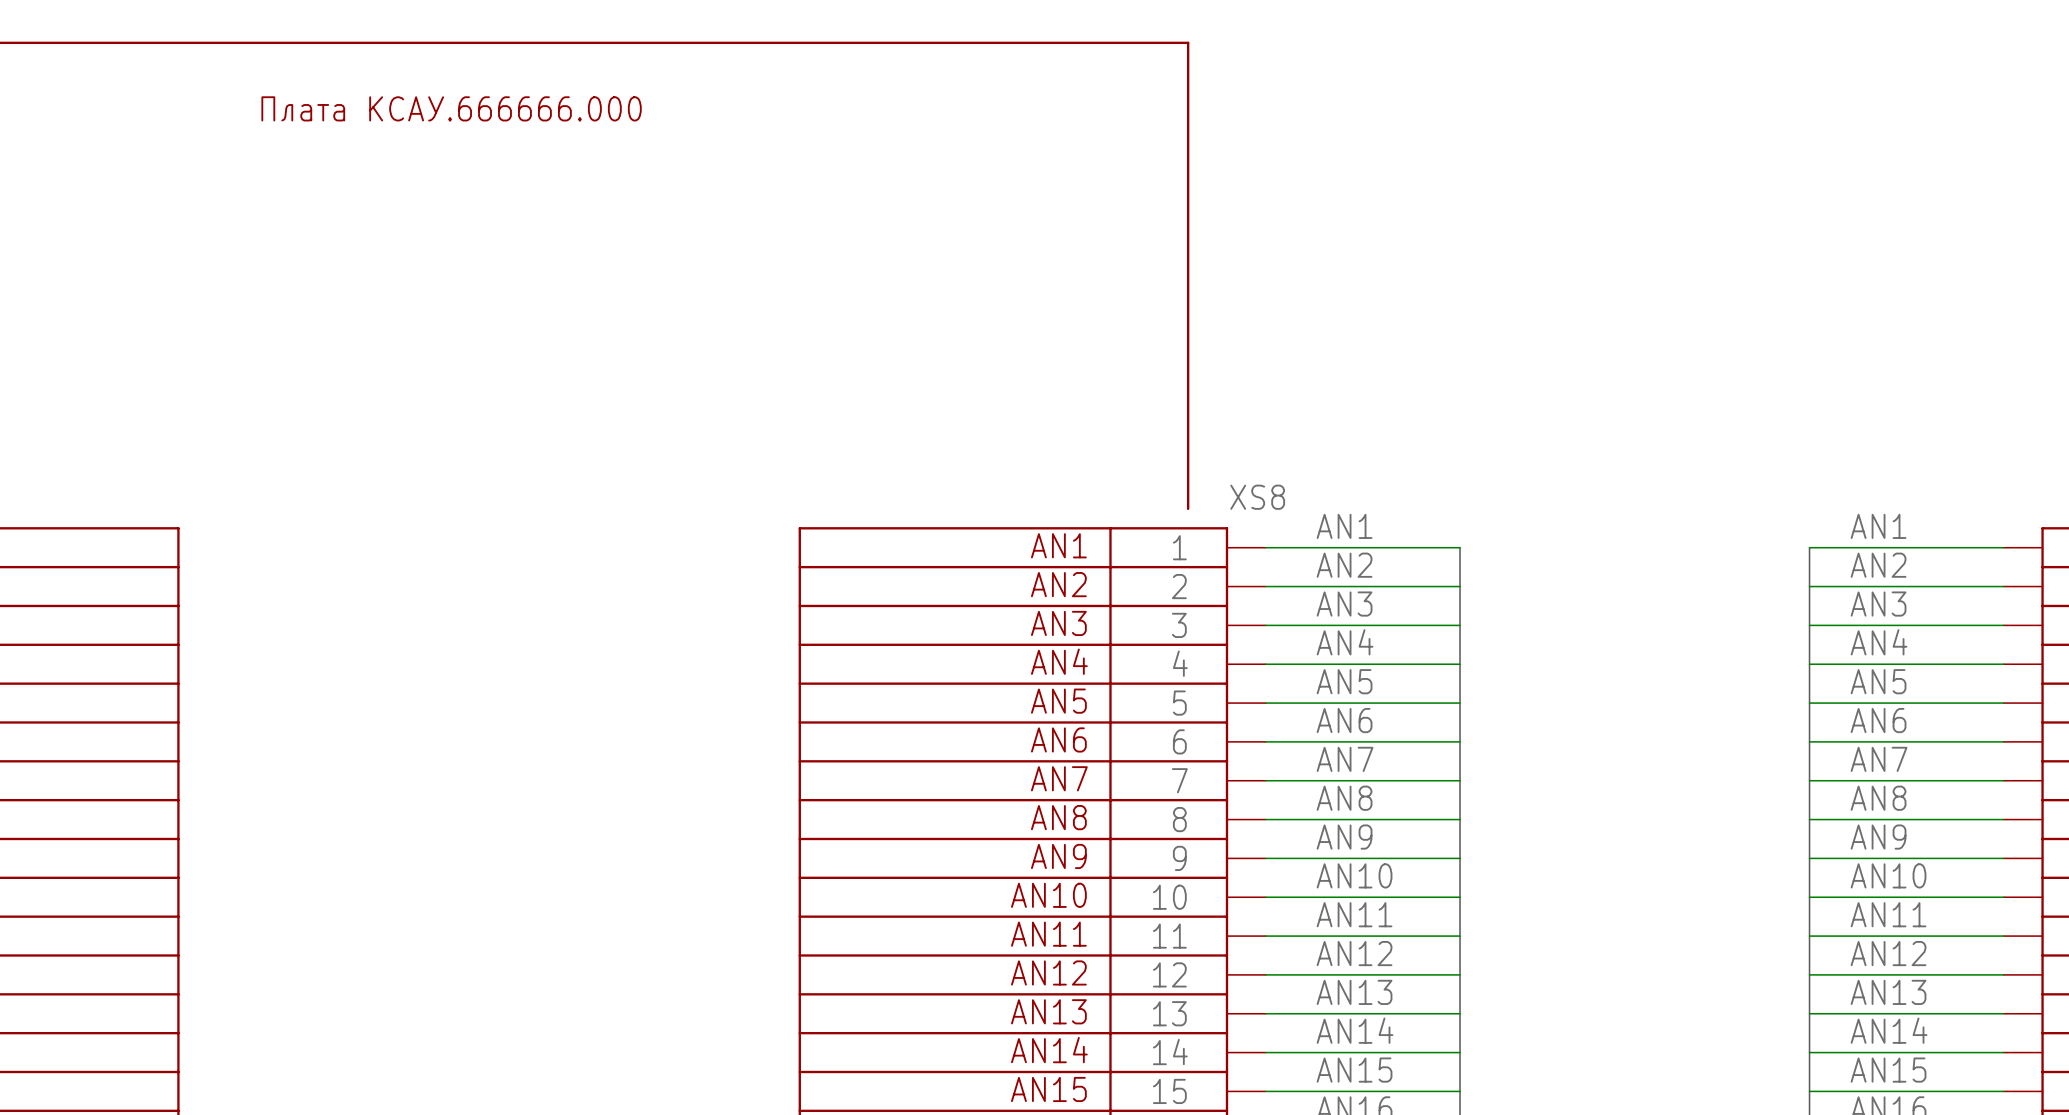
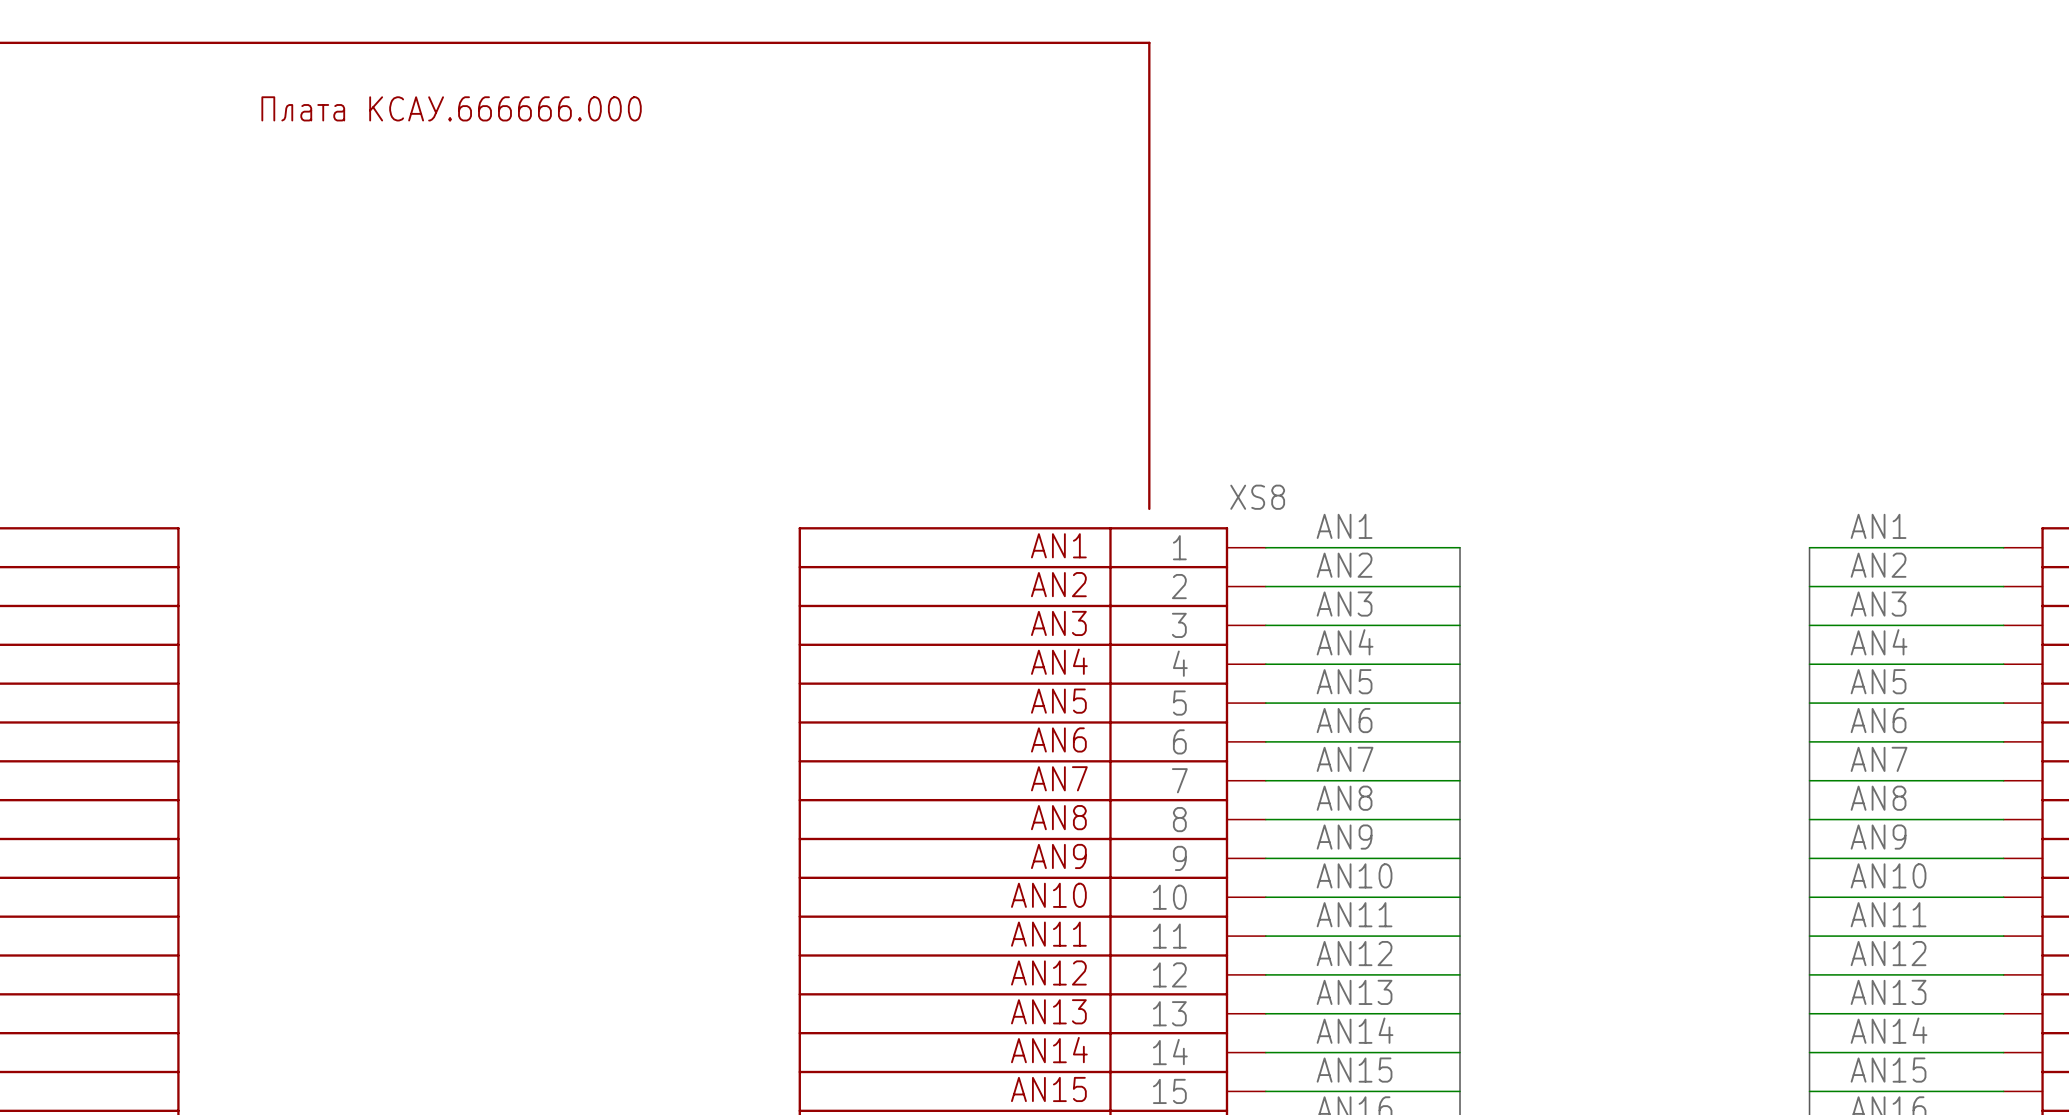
line: (1149, 42) (1188, 42) (1188, 508) -> (1149, 42) (1149, 508)

